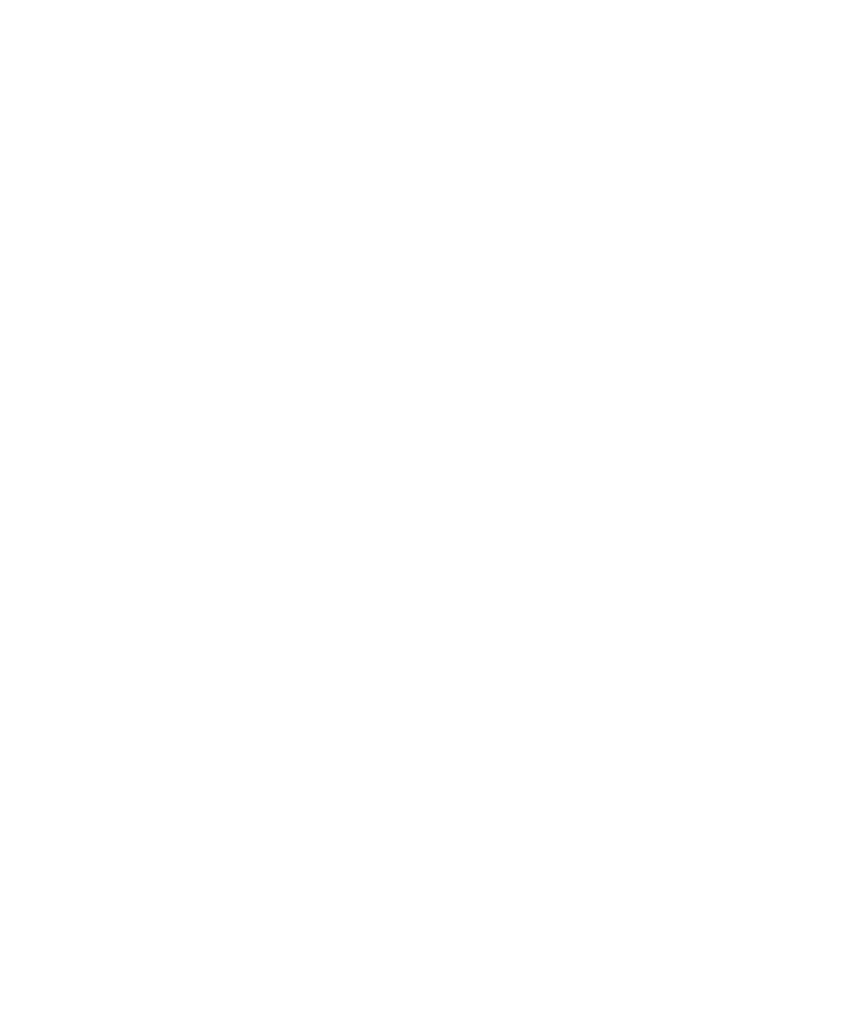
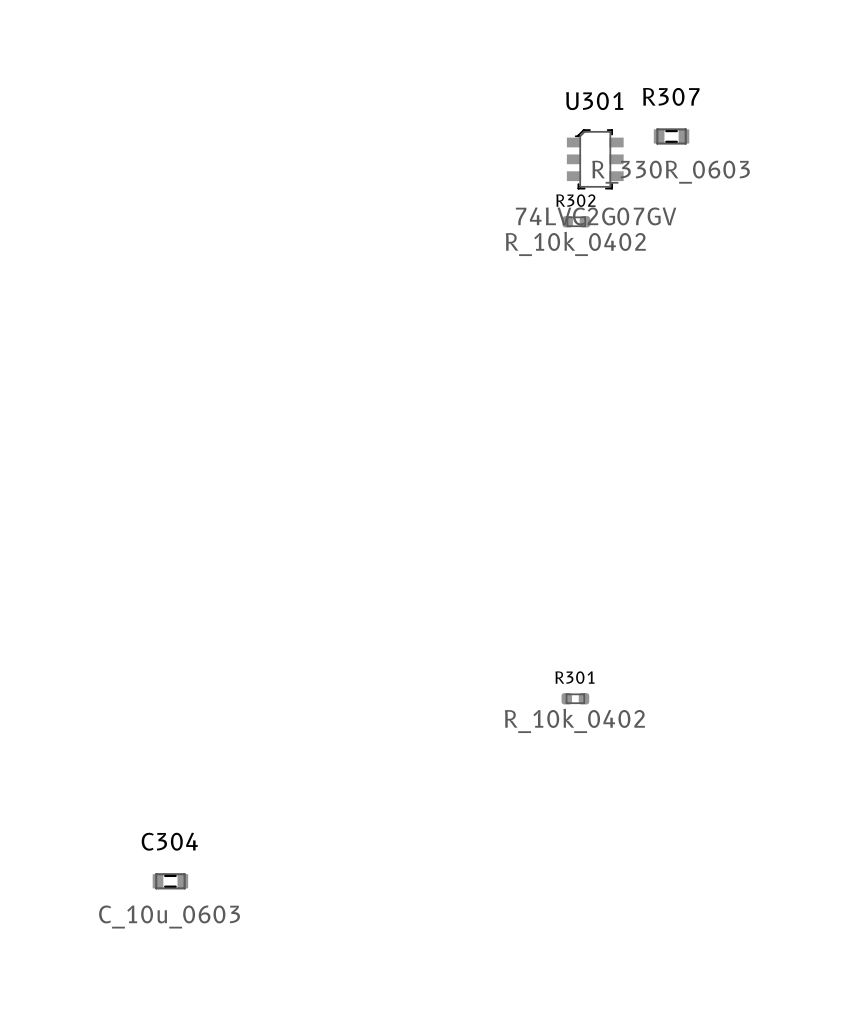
R307: none -> R_330R_0603 (671, 136)
U301: none -> 74LVC2G07GV (595, 159)
R302: none -> R_10k_0402 (576, 221)
R301: none -> R_10k_0402 (575, 698)
C304: none -> C_10u_0603 (170, 881)

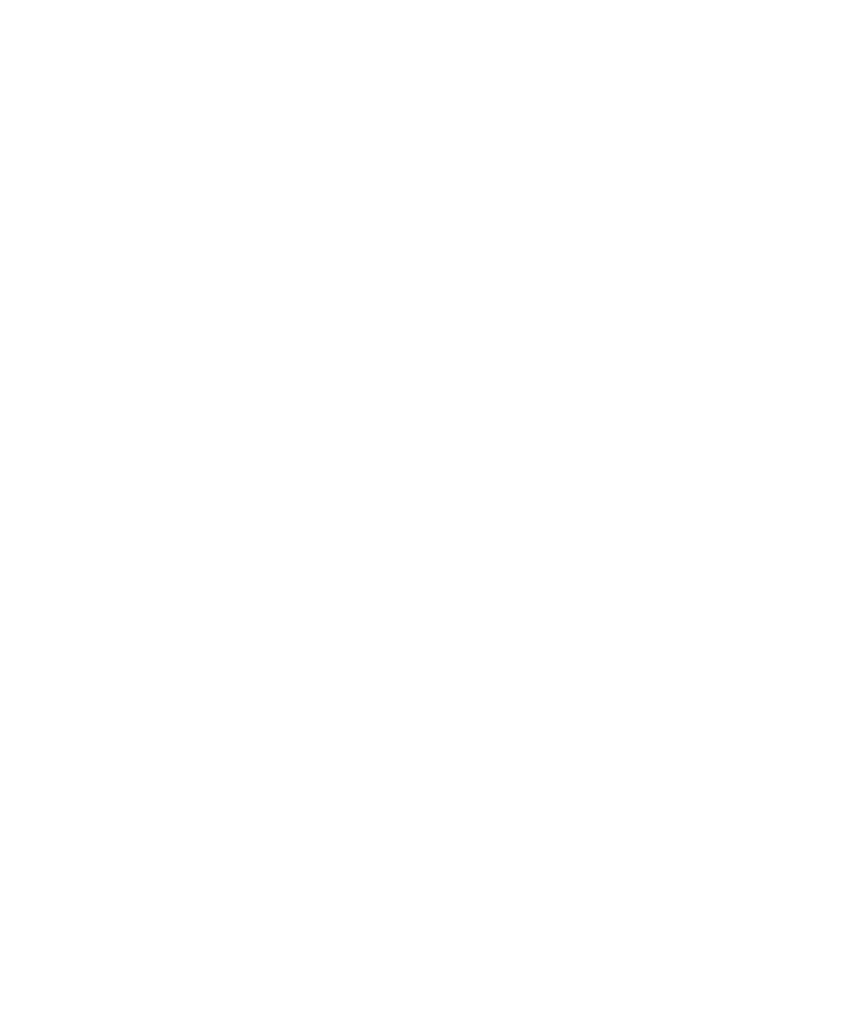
R307: R_330R_0603 (671, 136) -> none
U301: 74LVC2G07GV (595, 159) -> none
R302: R_10k_0402 (576, 221) -> none
R301: R_10k_0402 (575, 698) -> none
C304: C_10u_0603 (170, 881) -> none

